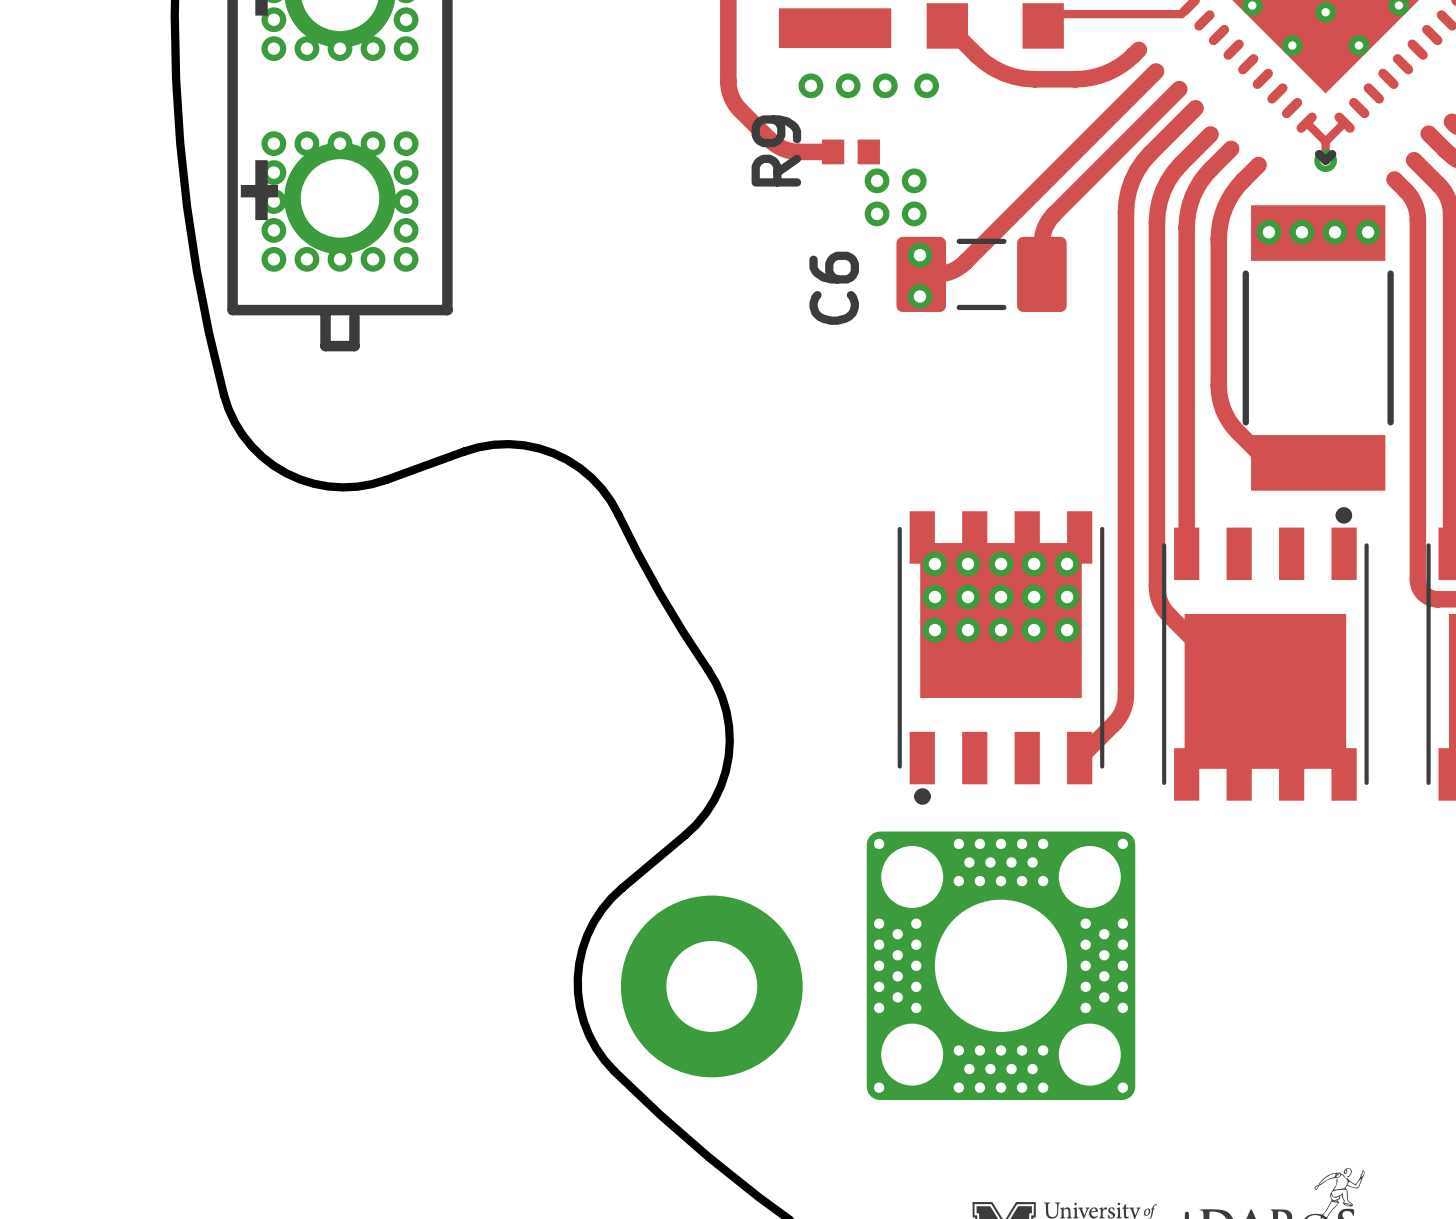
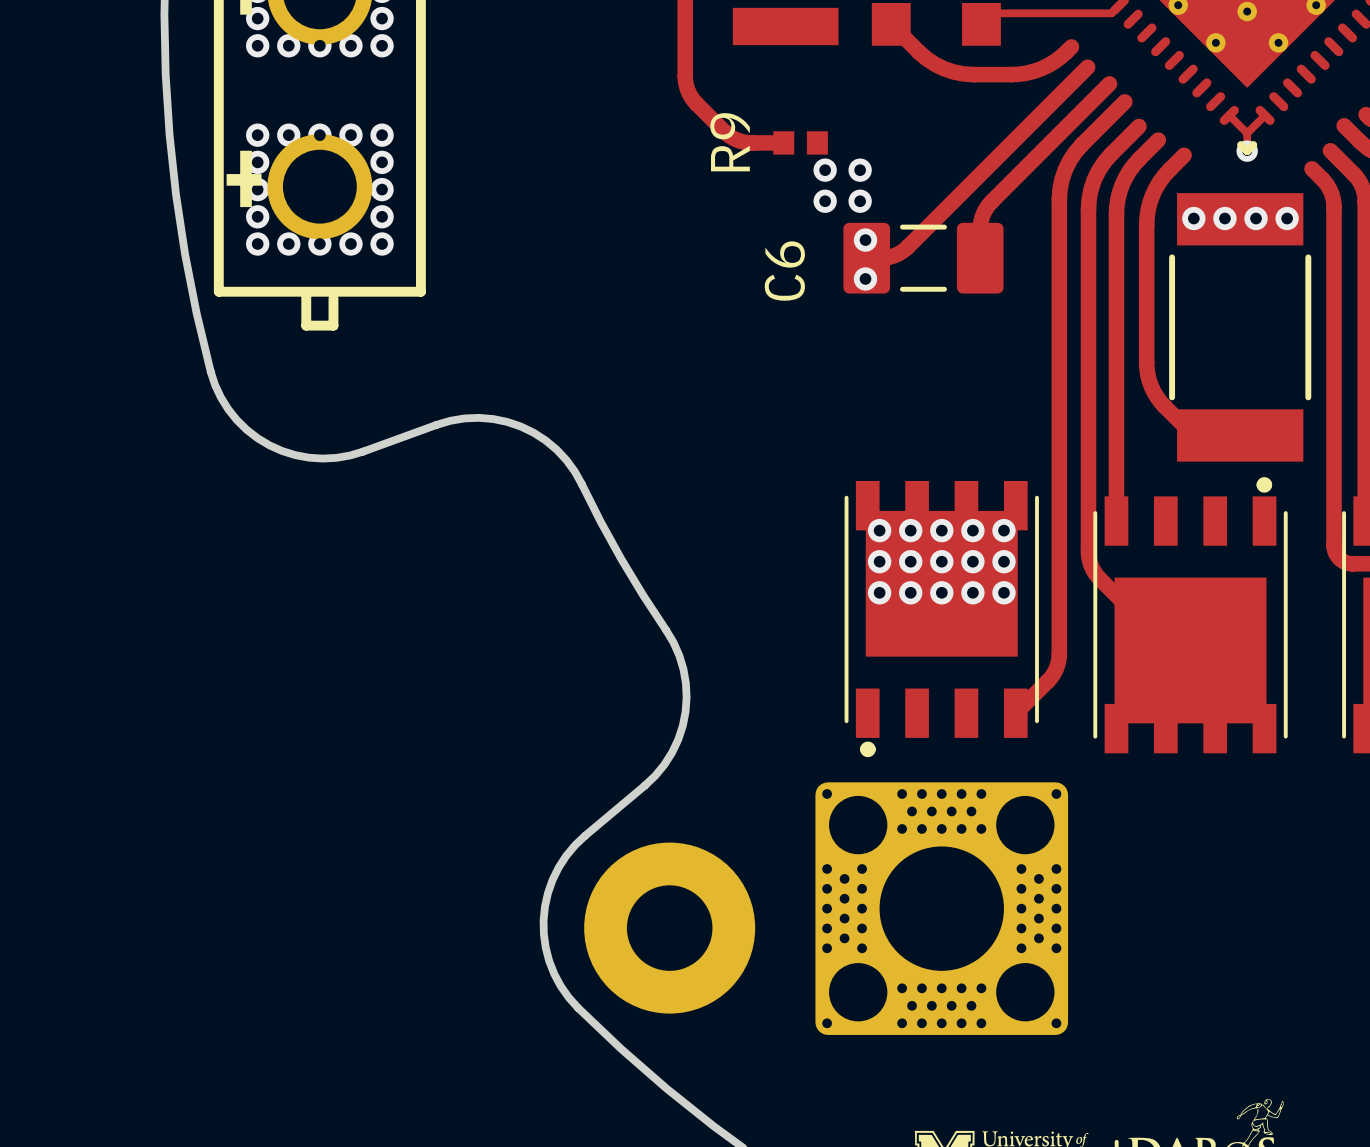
via: (810, 85) -> none
via: (848, 85) -> none
via: (885, 85) -> none
via: (926, 85) -> none

